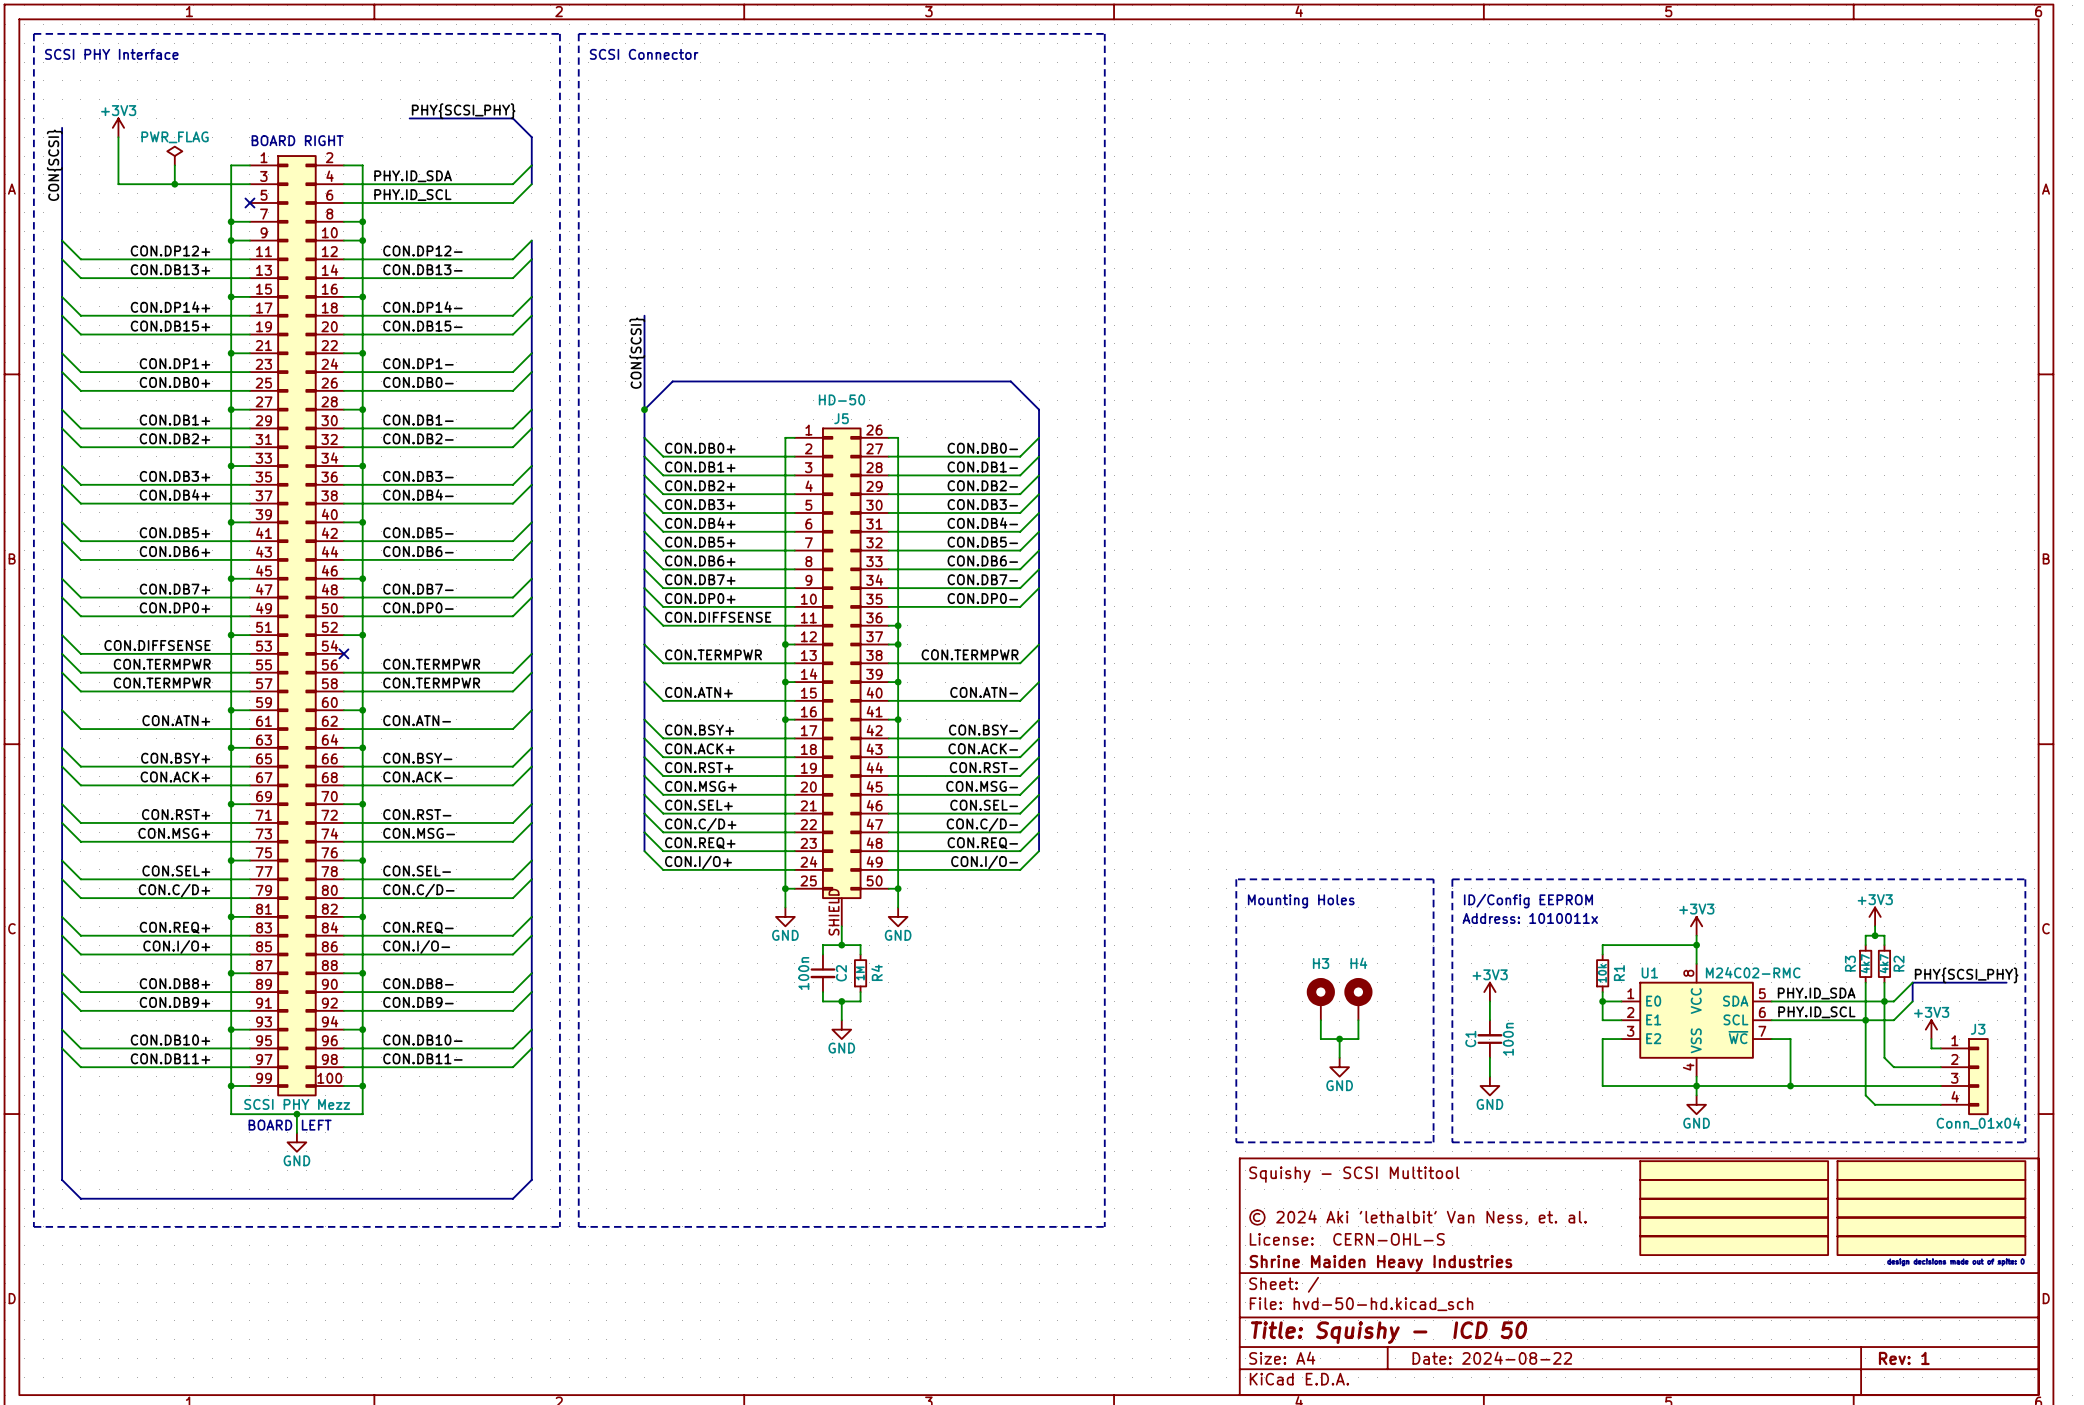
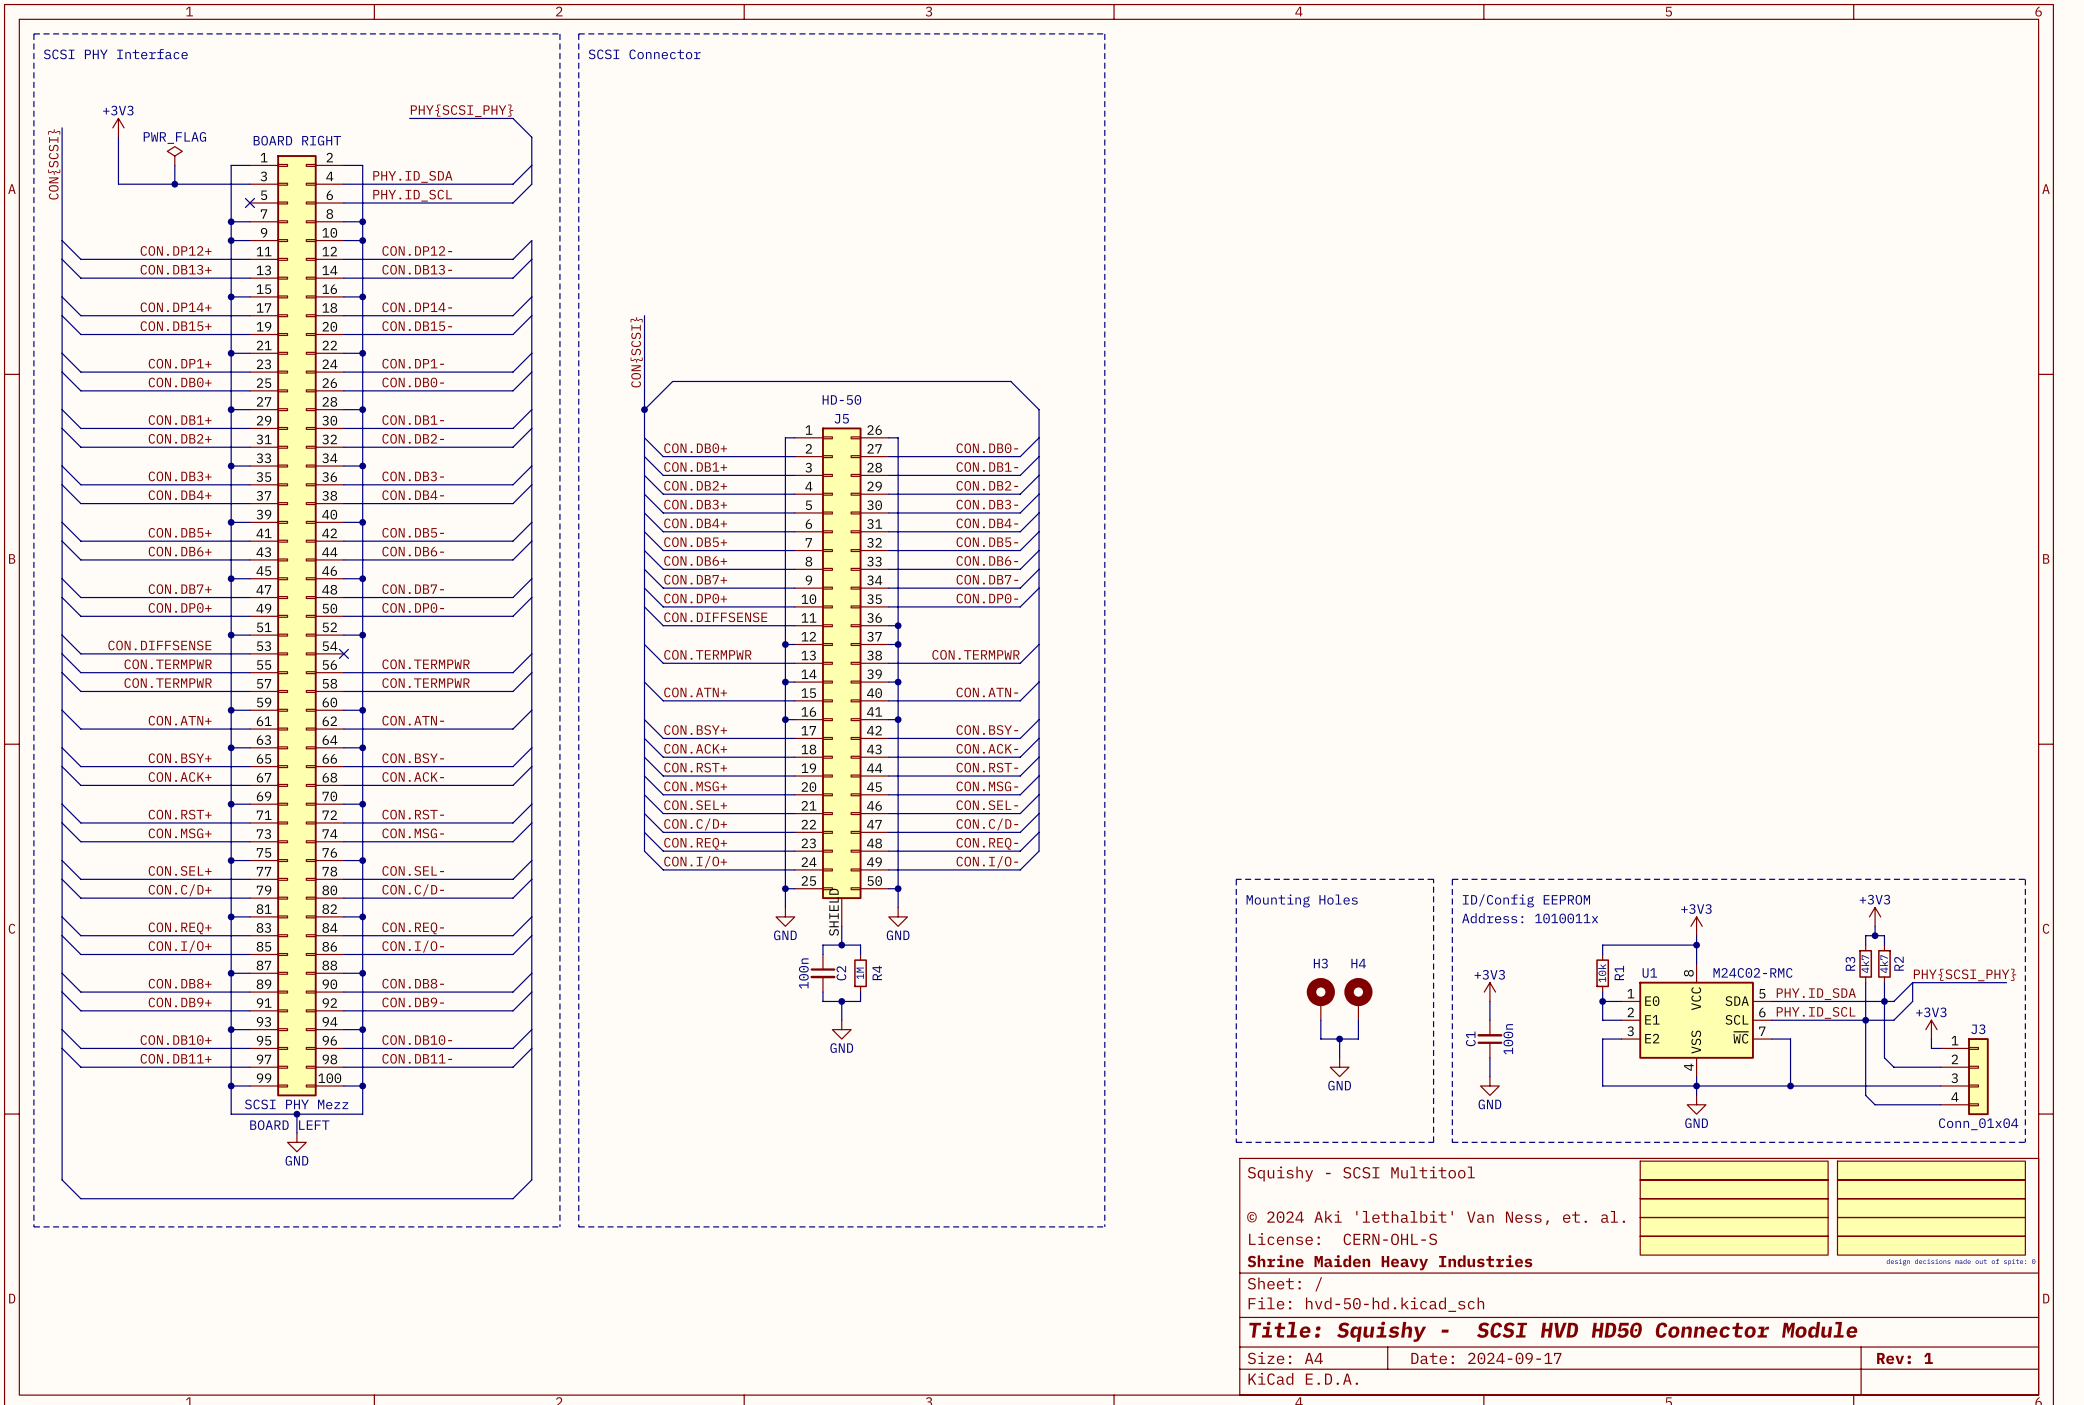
title block: Title: Squishy - ICD 50 (1389, 1332) -> Title: Squishy - SCSI HVD HD50 Connector Module (1553, 1331)
title block: Date: 2024-08-22 (1492, 1358) -> Date: 2024-09-17 (1486, 1358)

